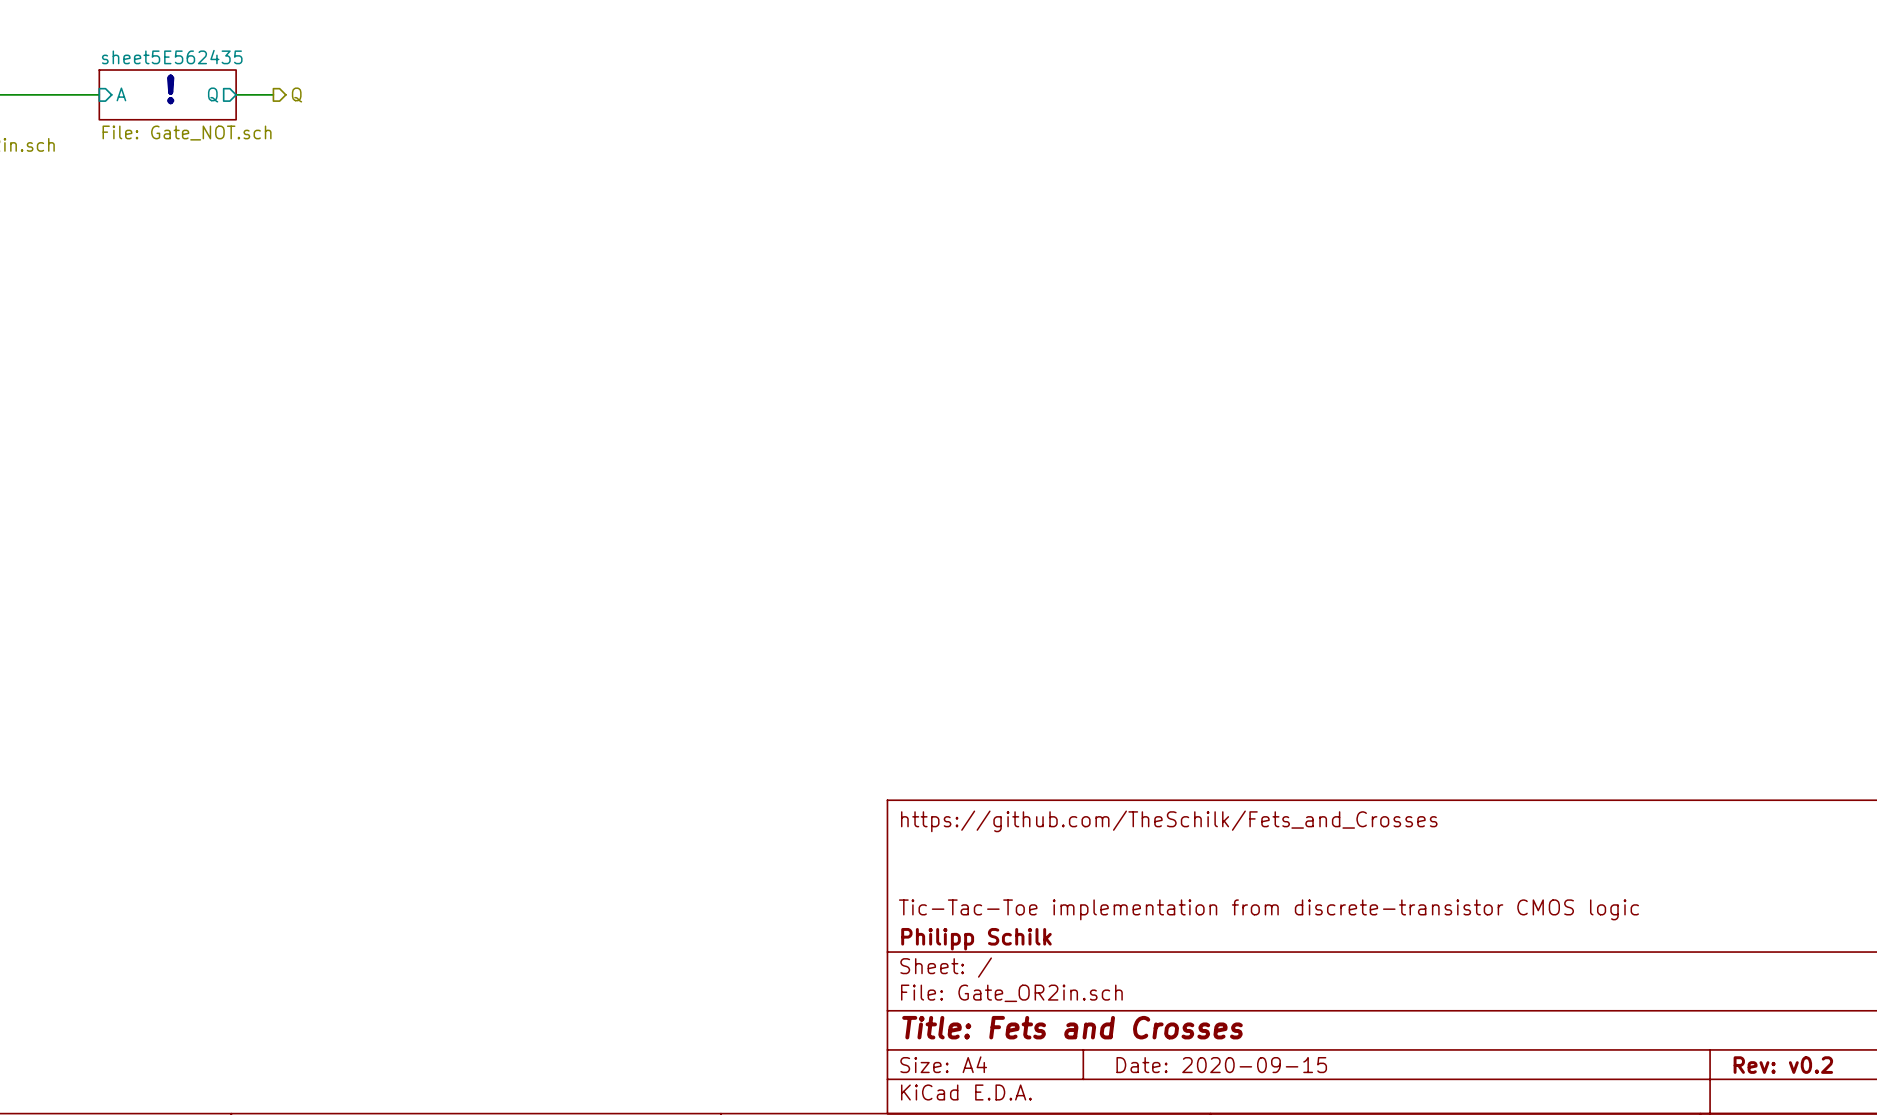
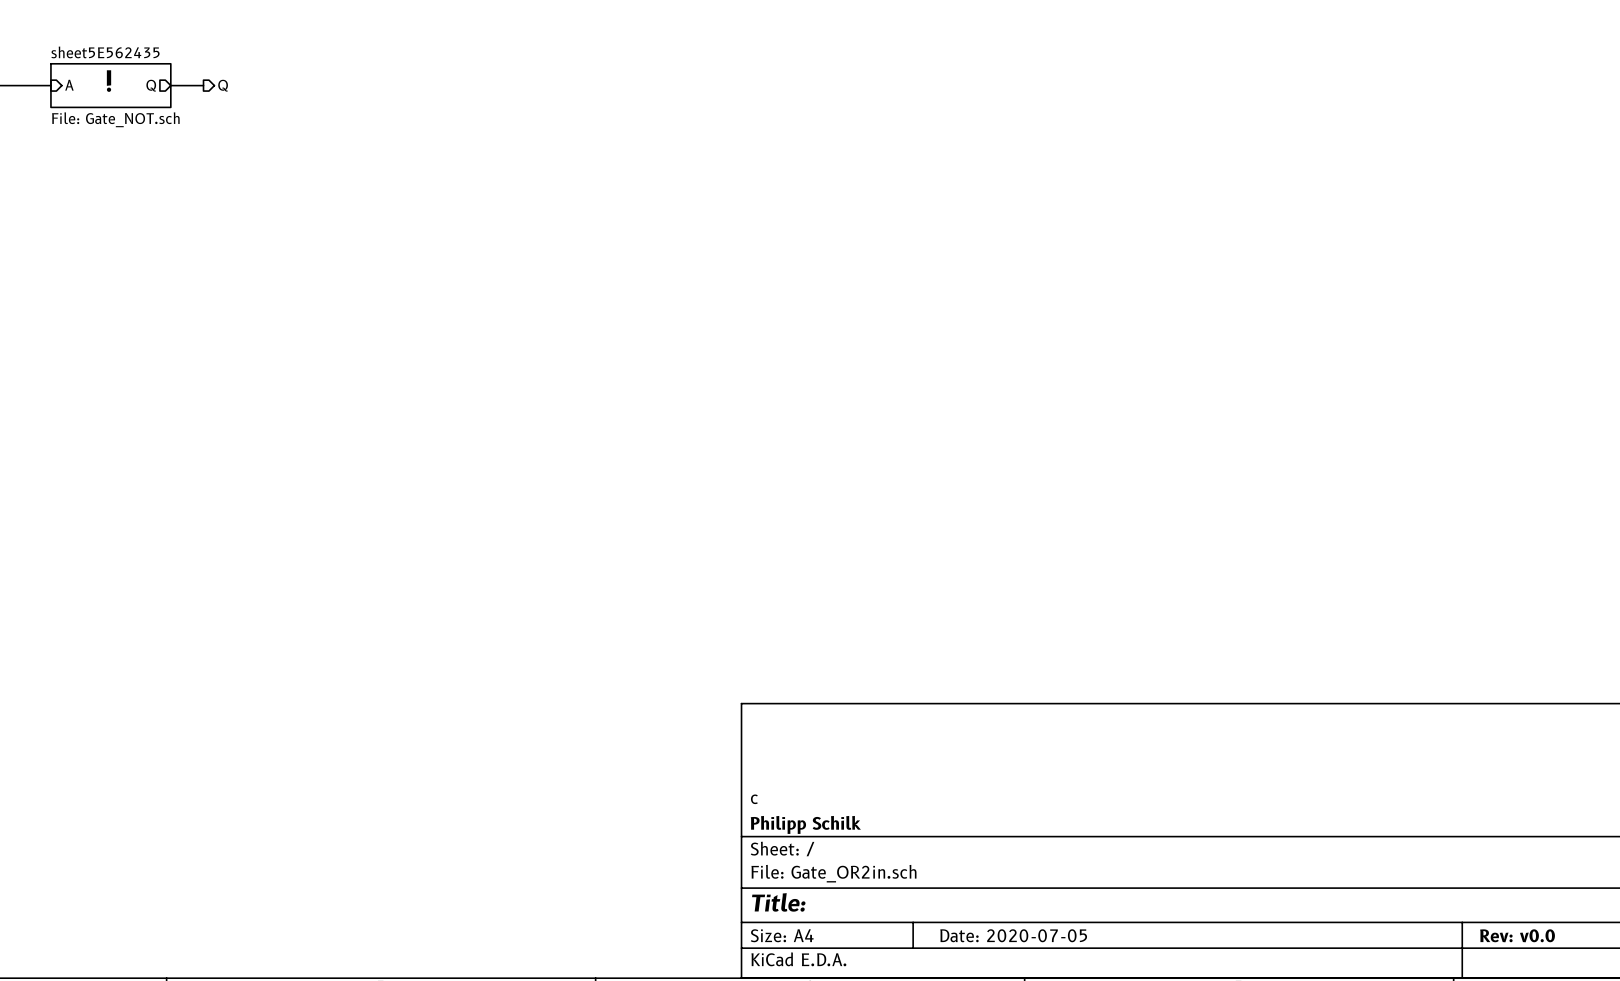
title block: https://github.com/TheSchilk/Fets_and_Crosses (1169, 821) -> none
title block: Tic-Tac-Toe implementation from discrete-transistor CMOS logic (1268, 909) -> c (754, 799)
title block: Title: Fets and Crosses (1072, 1027) -> Title: (778, 902)
title block: Date: 2020-09-15 (1221, 1065) -> Date: 2020-07-05 (1013, 935)
title block: Rev: v0.2 (1783, 1065) -> Rev: v0.0 (1517, 935)

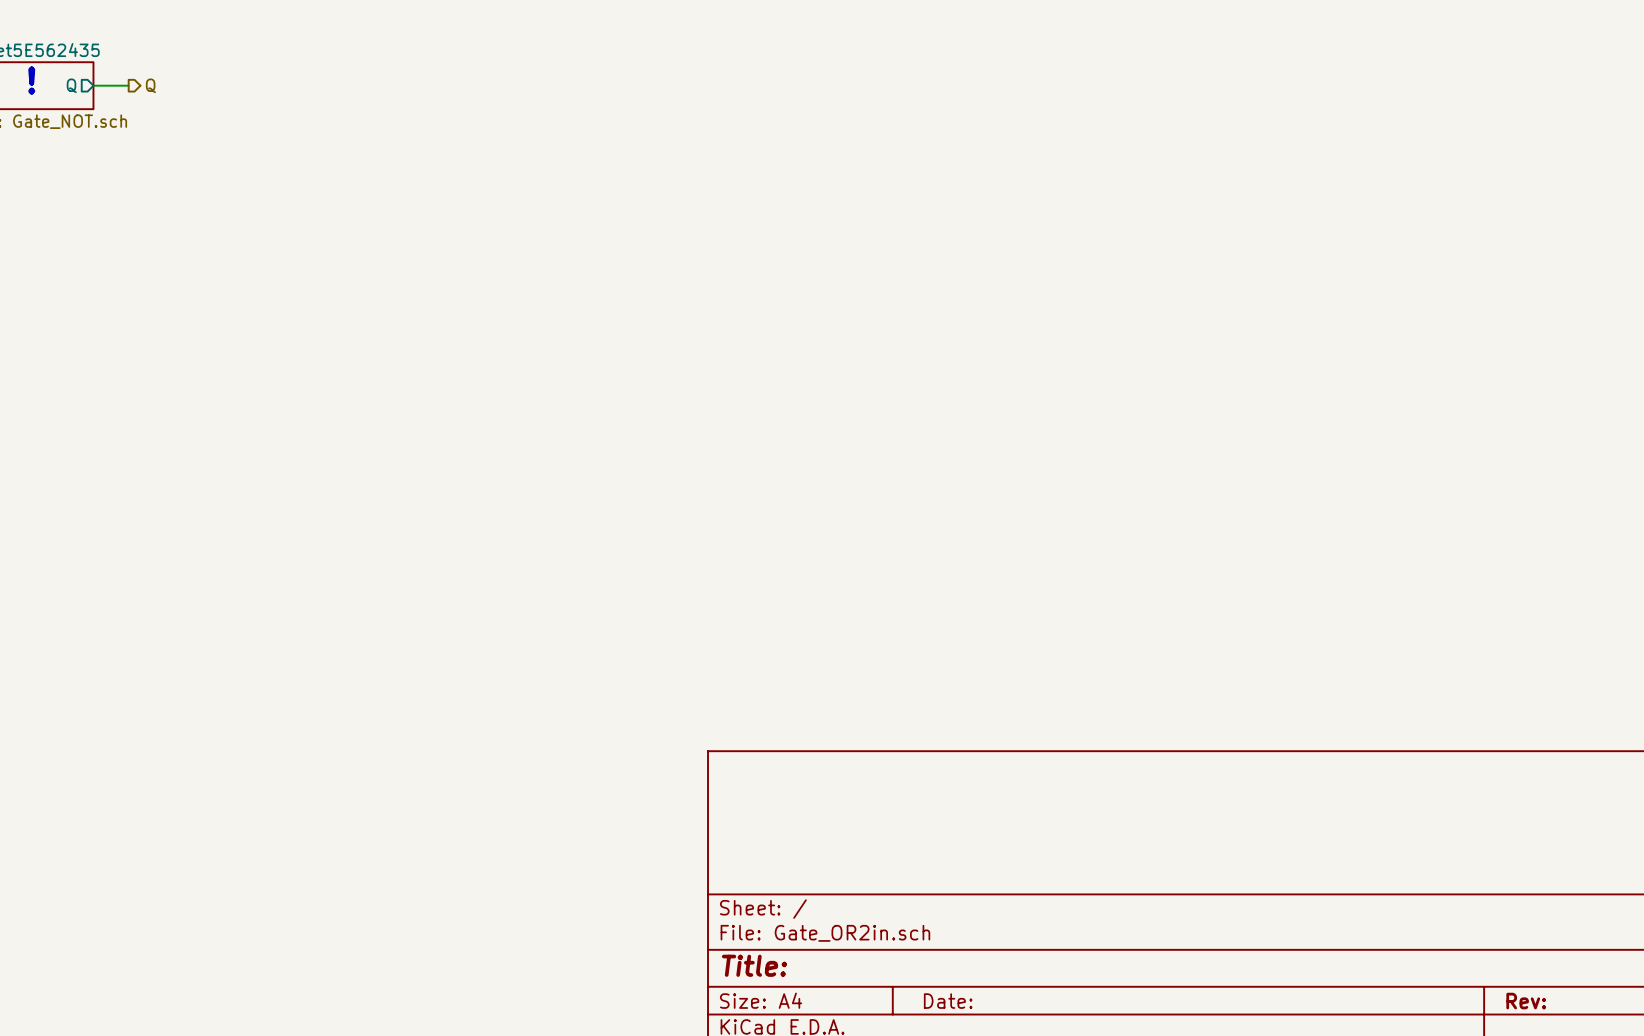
title block: c (754, 799) -> none
title block: Philipp Schilk (805, 824) -> none
title block: Date: 2020-07-05 (1013, 935) -> Date: (948, 1001)
title block: Rev: v0.0 (1517, 935) -> Rev: (1526, 1001)

